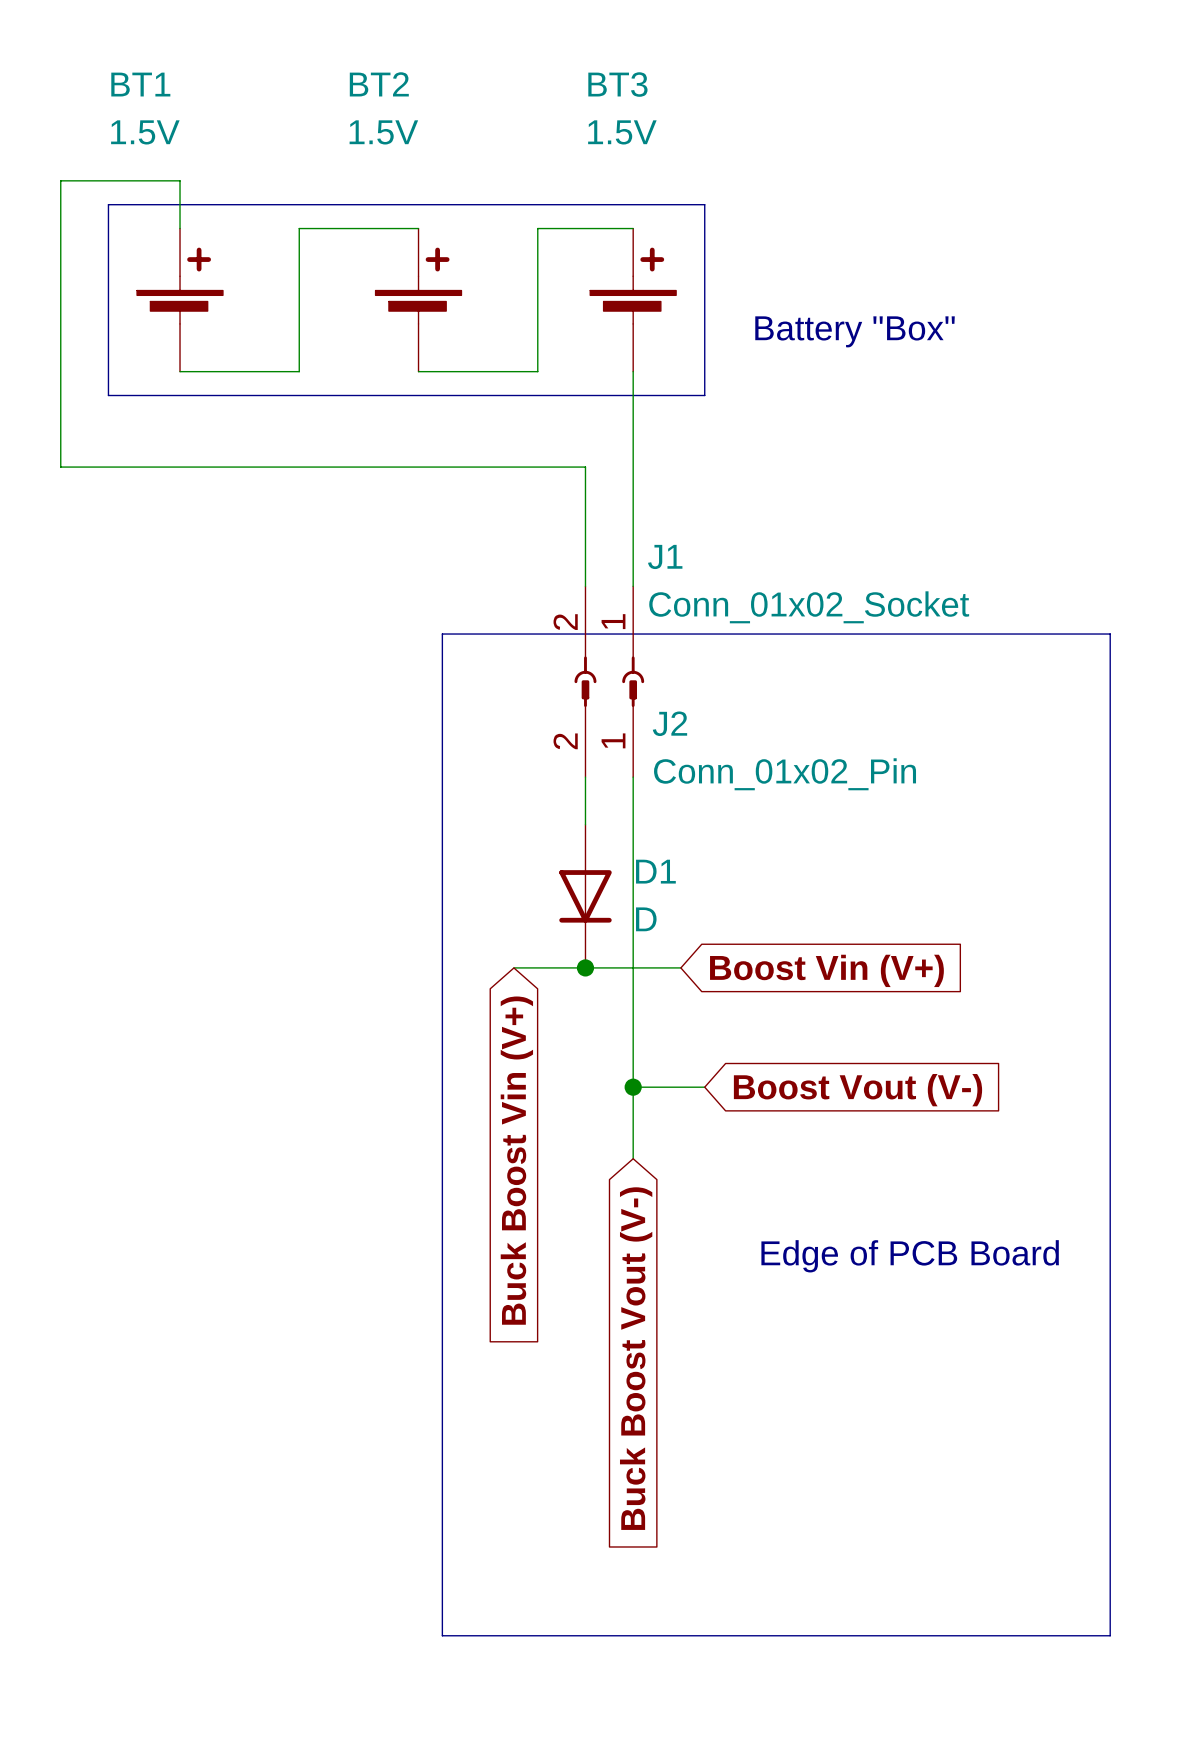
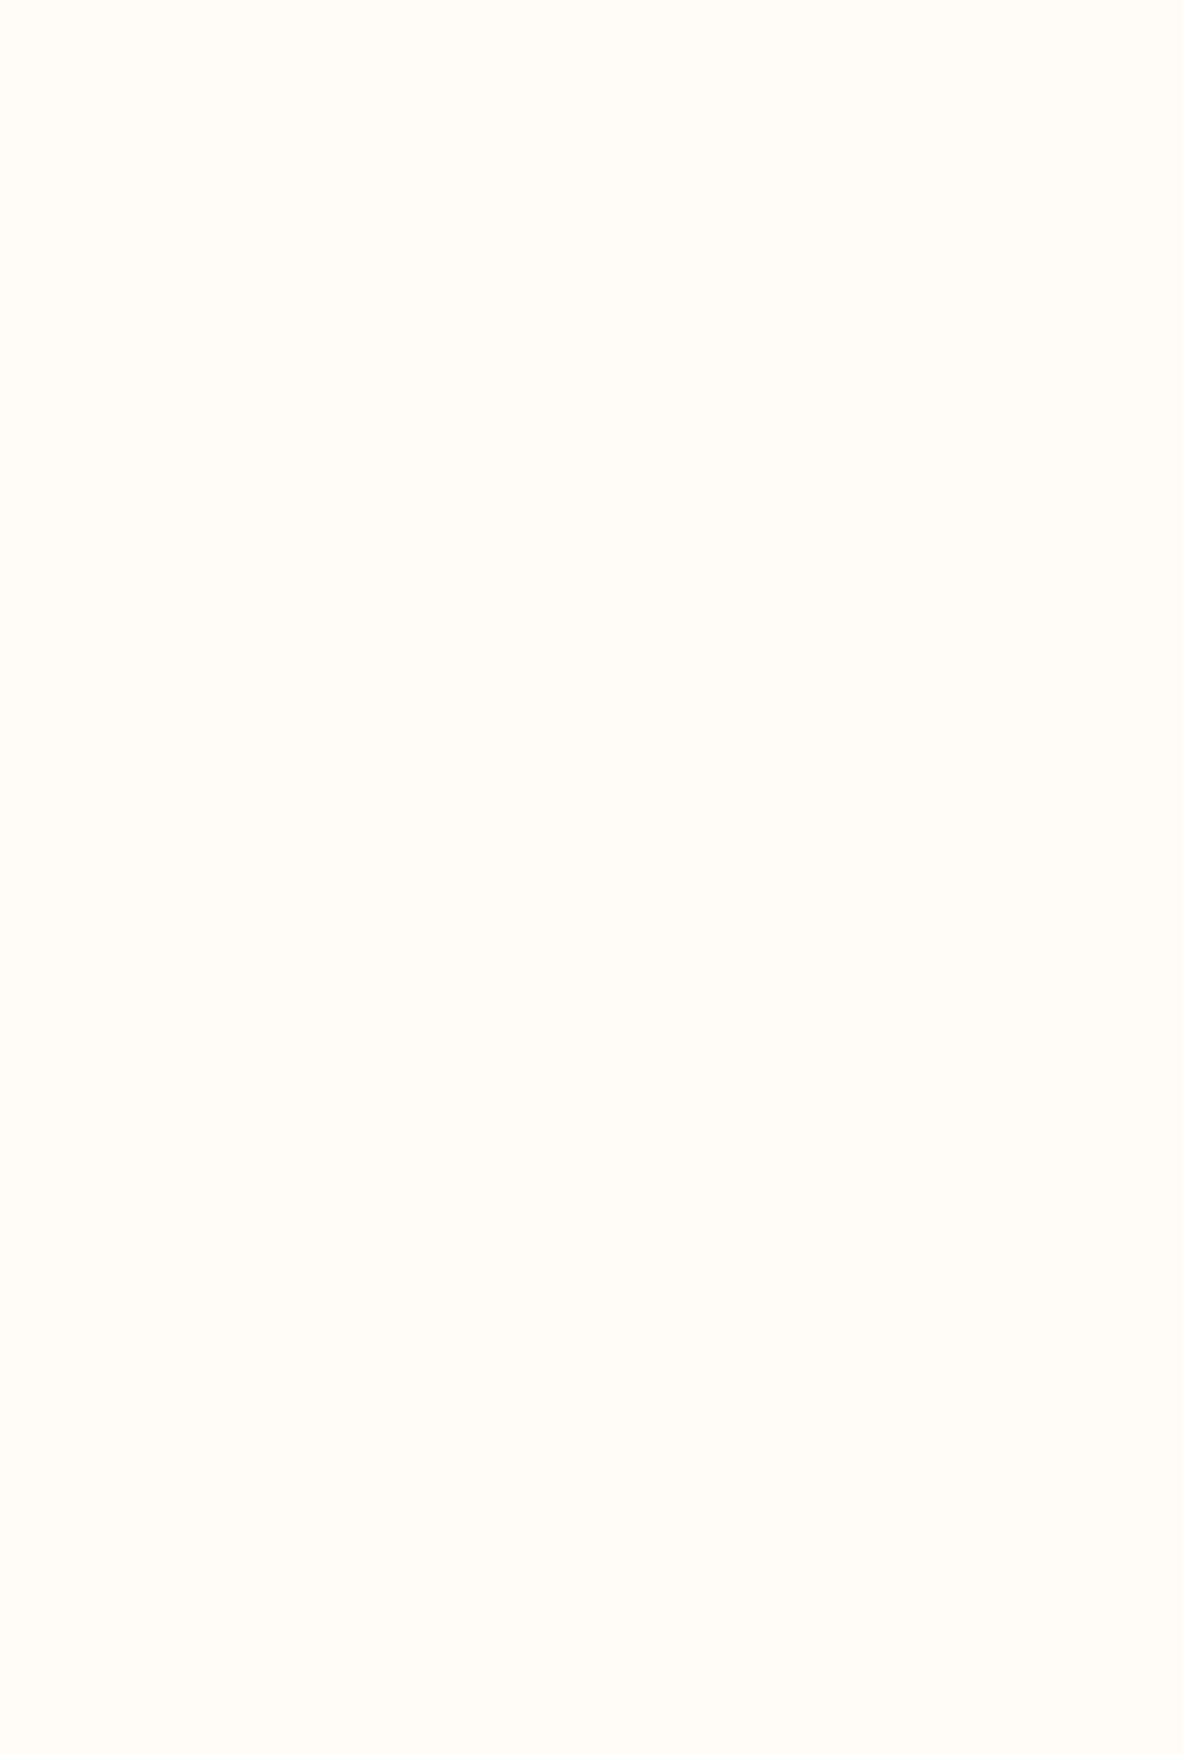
line: (108, 204) (704, 204) (704, 395) (108, 395) (108, 204) -> none
wire: (180, 228) (180, 180) (60, 180) (60, 467) (585, 467) (585, 586) -> none
wire: (418, 228) (299, 228) (299, 371) (180, 371) -> none
wire: (633, 228) (537, 228) (537, 371) (418, 371) -> none
BT1: 1.5V (180, 300) -> none
BT2: 1.5V (418, 300) -> none
BT3: 1.5V (633, 300) -> none
text: Battery "Box" (855, 331) -> none
wire: (633, 371) (633, 586) -> none
line: (442, 634) (1110, 634) (1110, 1635) (442, 1635) (442, 634) -> none
J1: Conn_01x02_Socket (609, 634) -> none
J2: Conn_01x02_Pin (609, 728) -> none
wire: (585, 777) (585, 824) -> none
wire: (633, 777) (633, 1158) -> none
D1: D (585, 896) -> none
wire: (513, 967) (680, 967) -> none
junction: (585, 967) -> none
global label: Boost Vin (V+) (826, 970) -> none
wire: (633, 1087) (704, 1087) -> none
junction: (633, 1087) -> none
global label: Boost Vout (V-) (857, 1090) -> none
global label: Buck Boost Vin (V+) (516, 1160) -> none
text: Edge of PCB Board (910, 1256) -> none
global label: Buck Boost Vout (V-) (636, 1358) -> none

